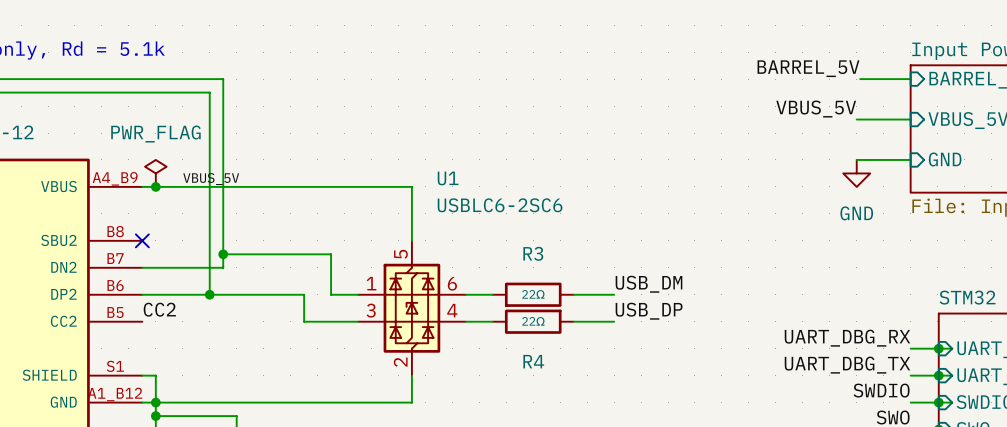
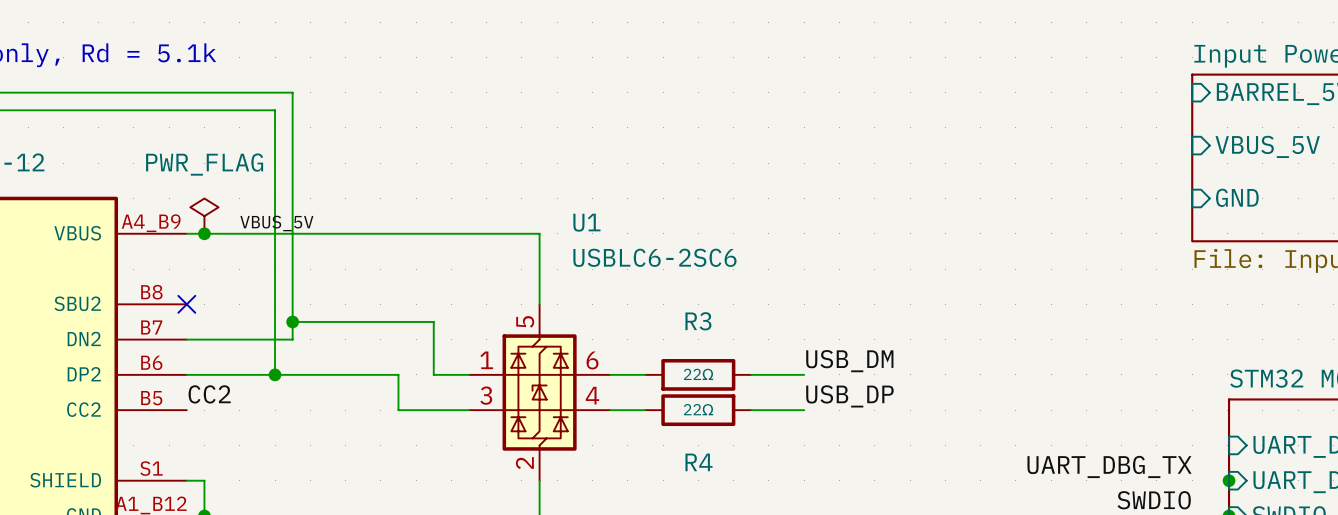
label: BARREL_5V (808, 68) -> none
wire: (860, 79) (910, 79) -> none
label: VBUS_5V (816, 109) -> none
wire: (856, 119) (910, 119) -> none
wire: (856, 159) (910, 159) -> none
power symbol: GND (856, 173) -> none
label: UART_DBG_RX (847, 338) -> none
wire: (910, 348) (951, 348) -> none
junction: (938, 348) -> none
wire: (910, 375) (951, 375) -> none

